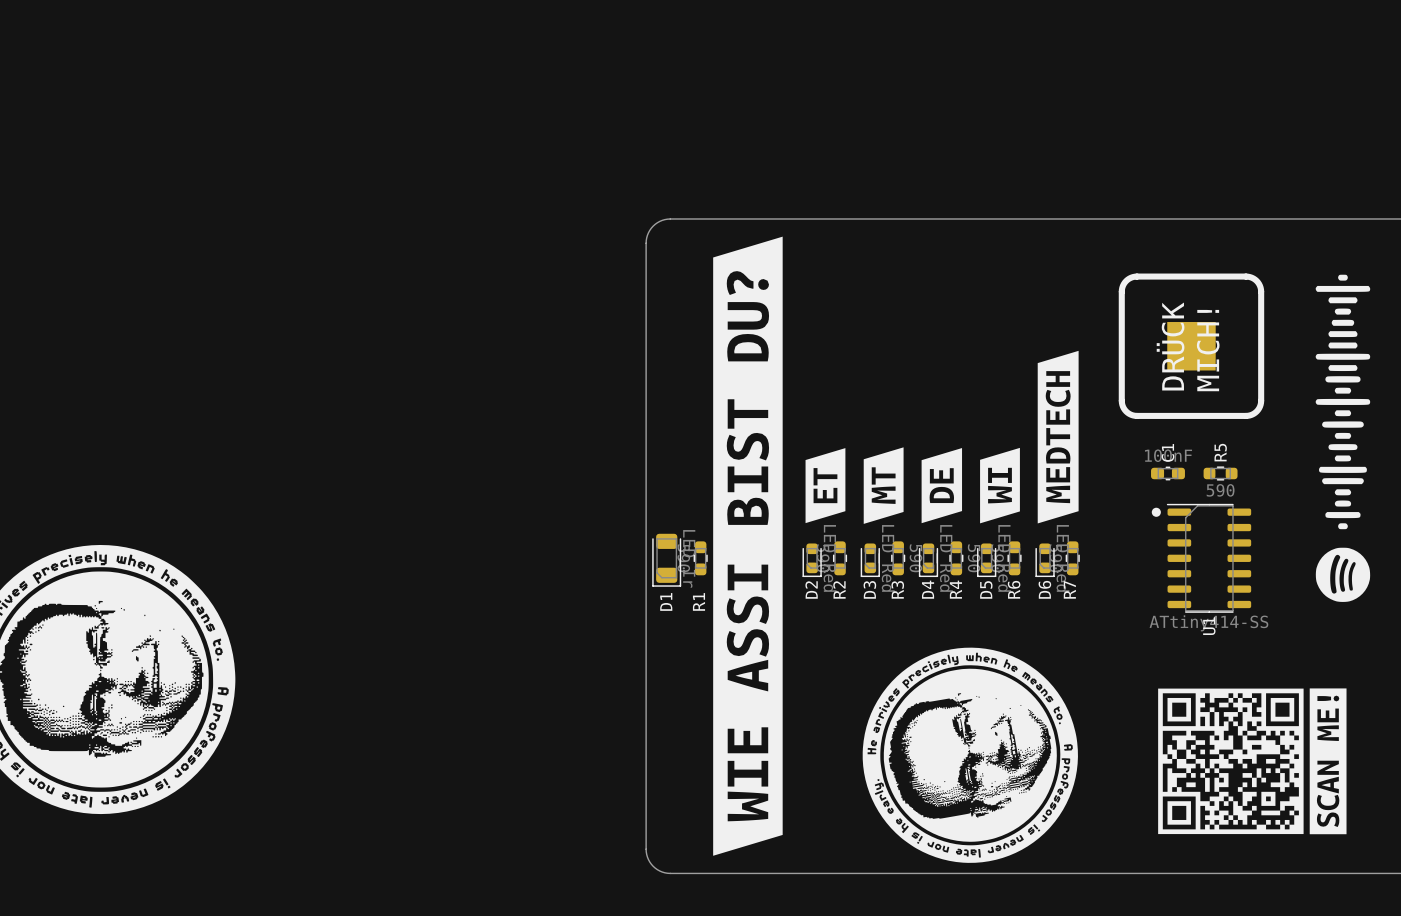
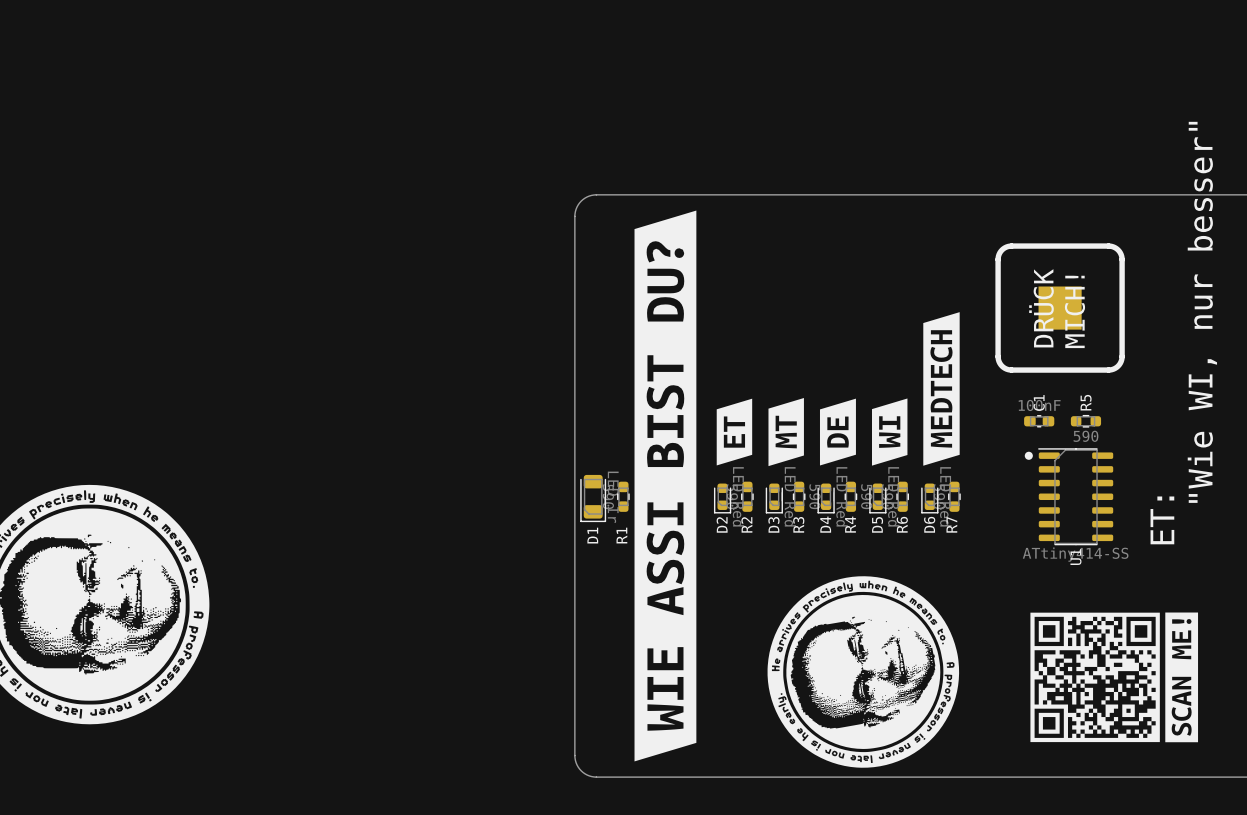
drawing: [1315, 274, 1371, 602] -> none
text: none -> "Wie WI, nur besser" (1202, 312)
text: none -> ET: (1162, 520)

